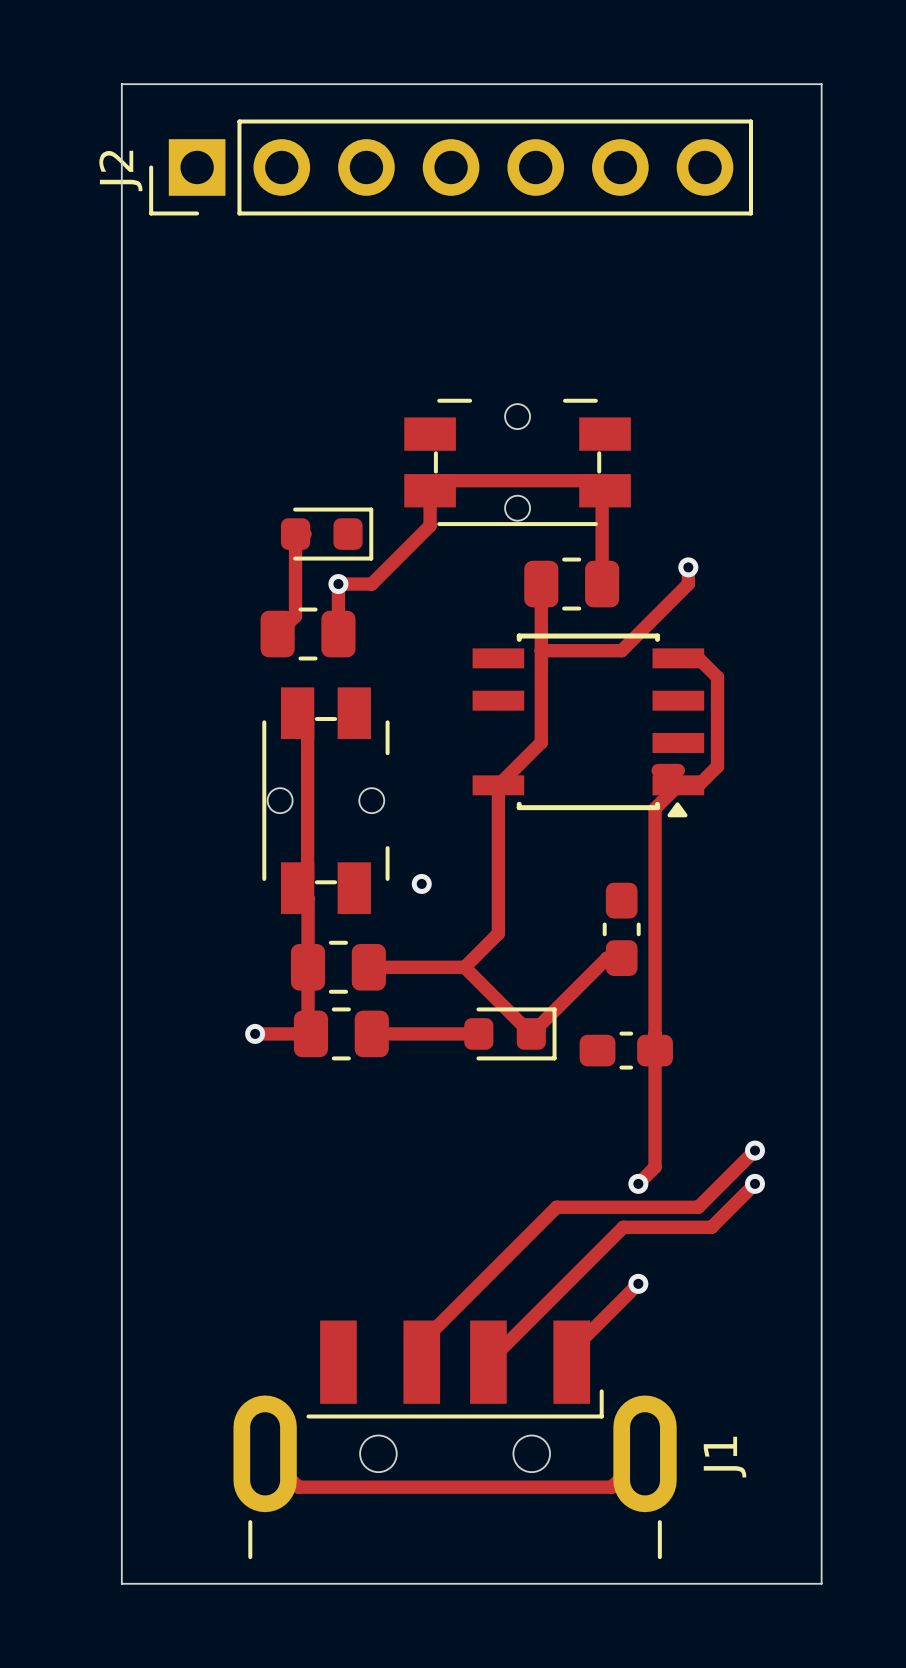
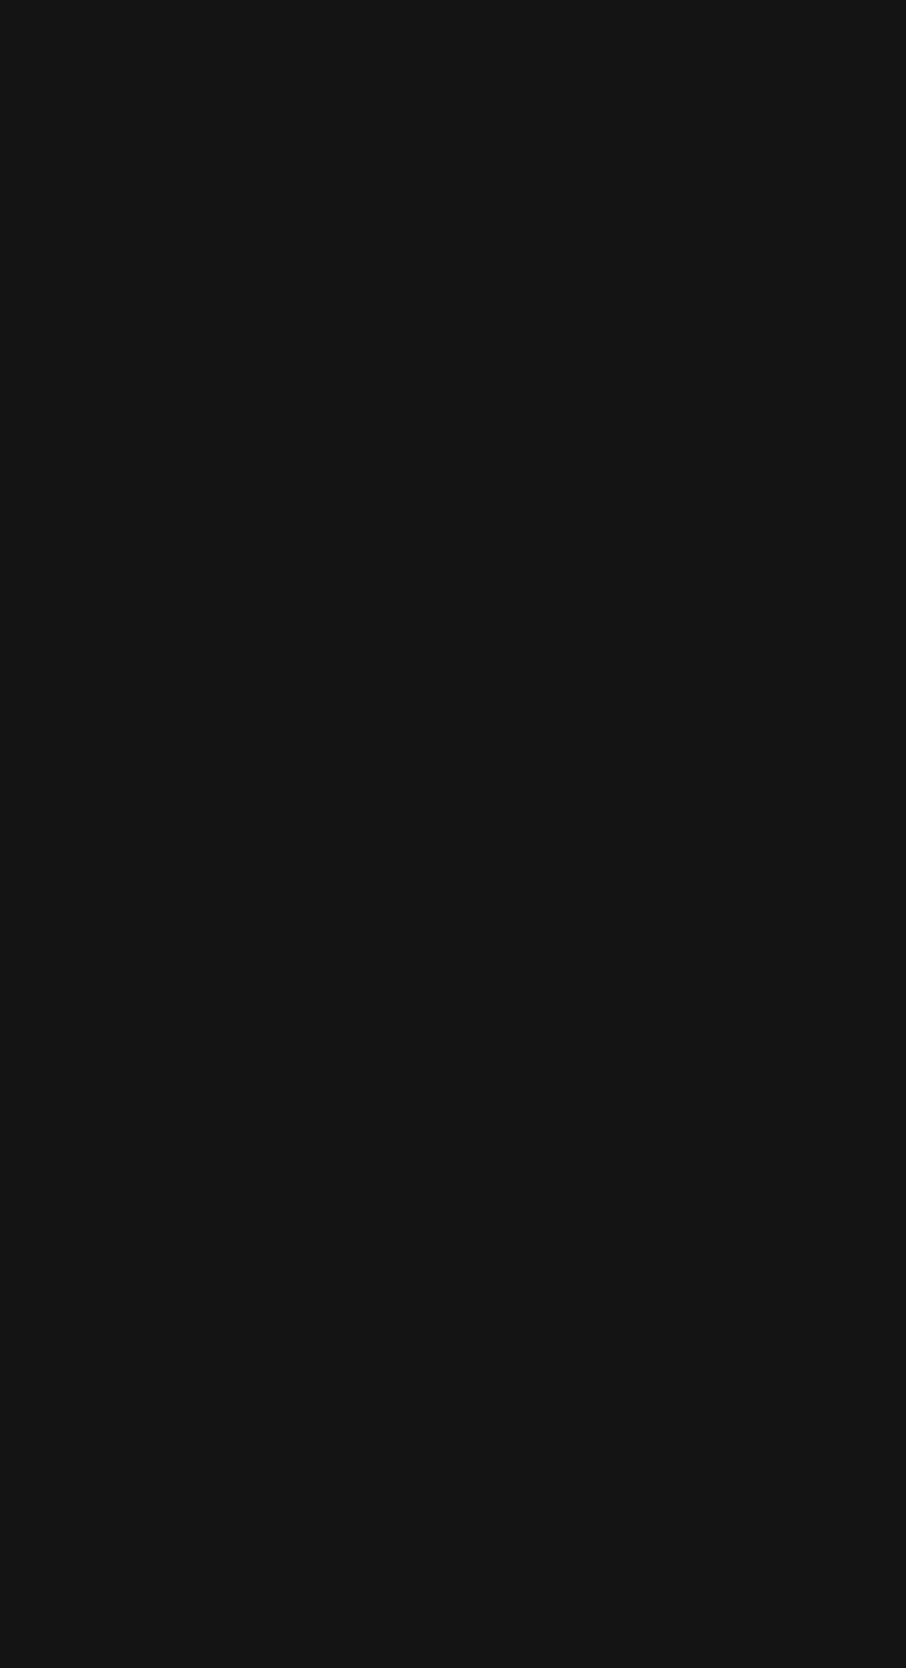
board edge: (121, 84) (821, 84) (821, 1583) (121, 1583) (121, 84) -> none
J2: (451, 167) -> none
part: (517, 462) -> none
track: (305, 534) (295, 534) (295, 616) (277, 634) -> none
part: (327, 534) -> none
track: (688, 567) (688, 584) (621, 650) (541, 650) -> none
via: (688, 567) -> none
via: (338, 584) -> none
track: (541, 584) (541, 742) (498, 785) (498, 933) (464, 967) -> none
part: (571, 584) -> none
track: (602, 584) (602, 493) (605, 490) (595, 480) (440, 480) (430, 490) (430, 525) (371, 584) (338, 584) (338, 634) -> none
part: (308, 634) -> none
track: (678, 658) (698, 658) (717, 677) (717, 766) (698, 785) (678, 785) (655, 808) (655, 1167) (638, 1183) -> none
track: (297, 713) (307, 723) (307, 878) (297, 888) (308, 898) (308, 1031) -> none
part: (588, 725) -> none
track: (658, 770) (678, 770) -> none
part: (325, 800) -> none
via: (421, 883) -> none
part: (621, 929) -> none
track: (621, 958) (607, 958) (531, 1033) (464, 967) -> none
part: (338, 967) -> none
track: (368, 967) (464, 967) -> none
track: (305, 1028) (310, 1033) (255, 1033) -> none
via: (255, 1033) -> none
part: (341, 1033) -> none
track: (371, 1033) (478, 1033) -> none
part: (510, 1033) -> none
part: (626, 1050) -> none
track: (755, 1150) (698, 1207) (556, 1207) (421, 1342) (421, 1362) -> none
via: (755, 1150) -> none
via: (638, 1183) -> none
track: (755, 1183) (711, 1227) (623, 1227) (488, 1362) -> none
via: (755, 1183) -> none
track: (638, 1283) (571, 1350) (571, 1362) -> none
via: (638, 1283) -> none
J1: (455, 1439) -> none
track: (265, 1453) (298, 1487) (611, 1487) (645, 1453) -> none

